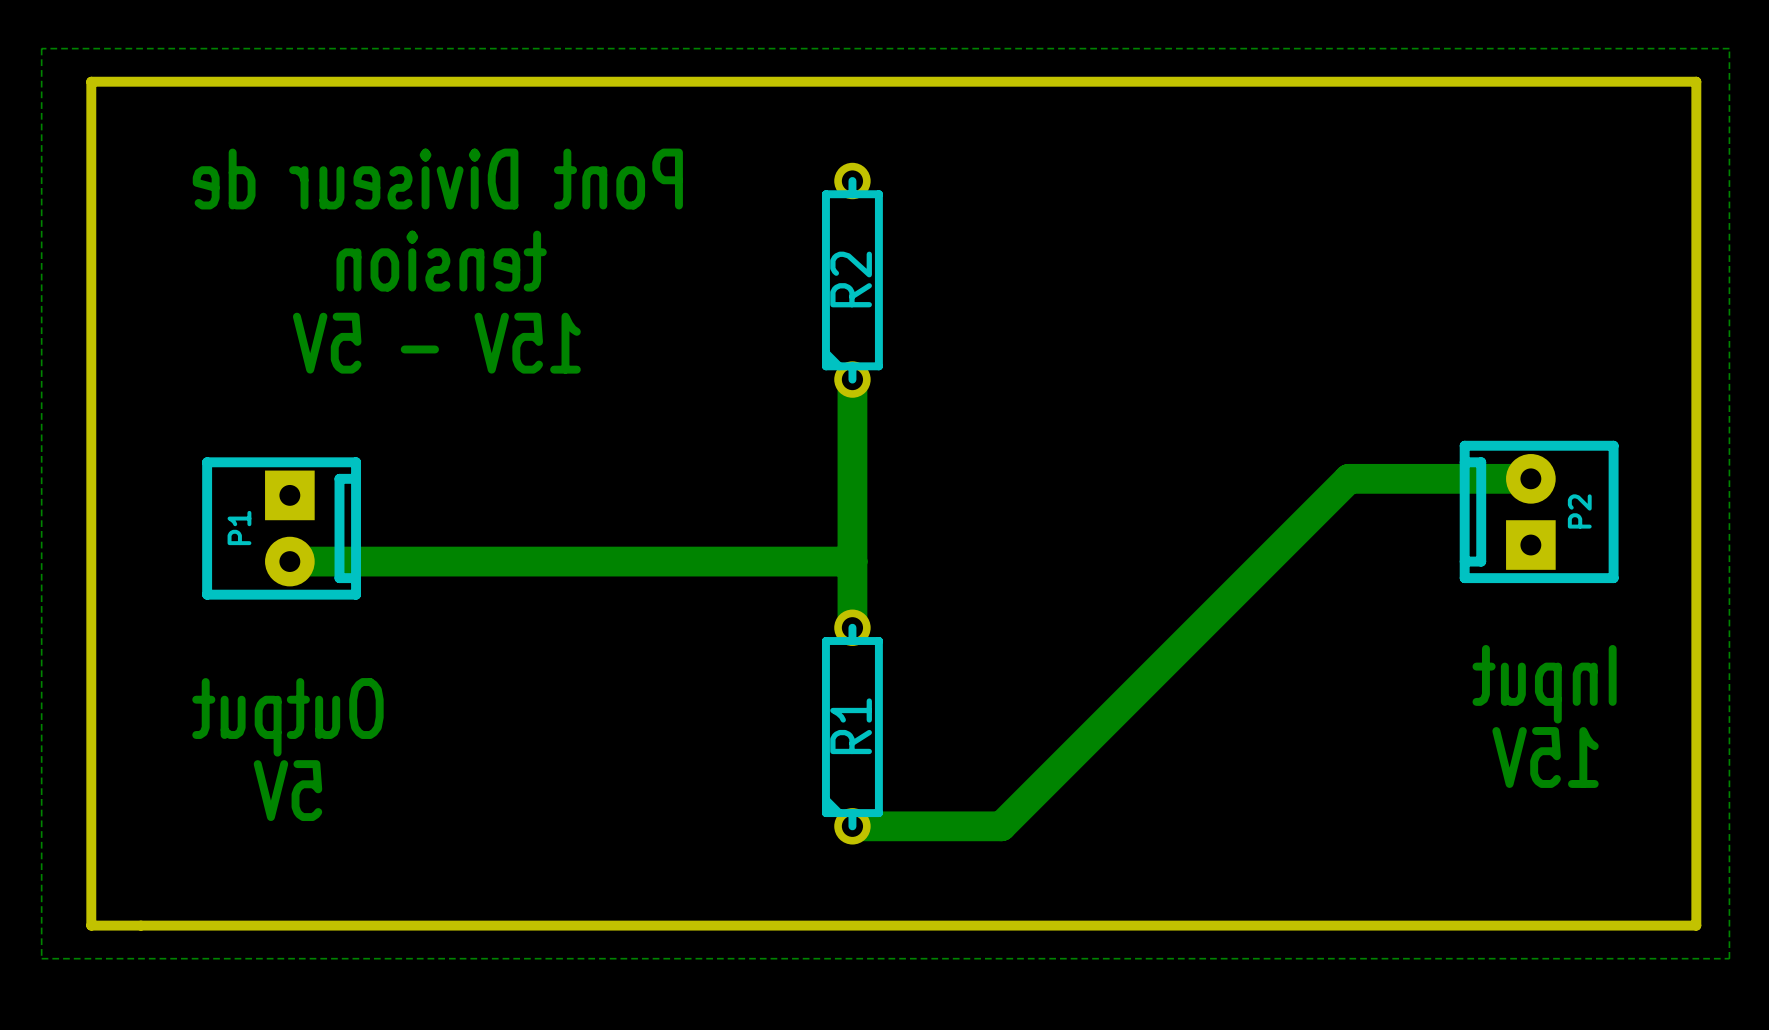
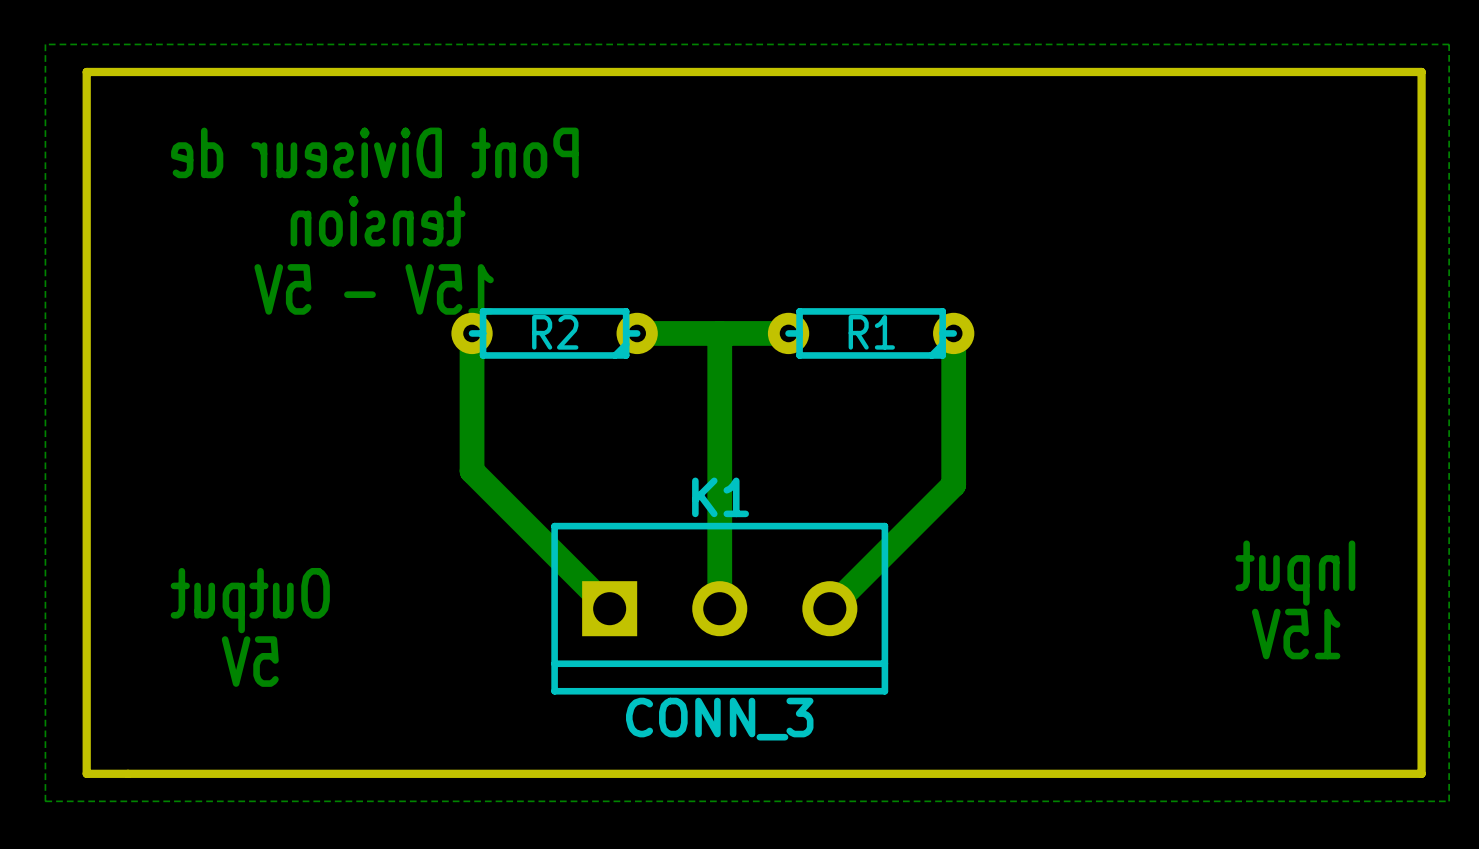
R2 footprint: [822, 162, 883, 398] -> [451, 308, 658, 359]
bottom track: none -> (472, 333) (472, 471) (609, 608)
bottom track: none -> (637, 333) (788, 333)
bottom track: none -> (953, 333) (953, 484) (829, 608)
bottom track: (1530, 478) (1348, 478) (1001, 826) (852, 826) -> none
P2: (1539, 511) -> none
P1: (281, 528) -> none
bottom track: (289, 561) (852, 561) -> none
R1 footprint: [822, 609, 883, 845] -> [767, 308, 975, 359]
bottom track: none -> (719, 526) (719, 608)
K1: none -> CONN_3 (719, 608)

